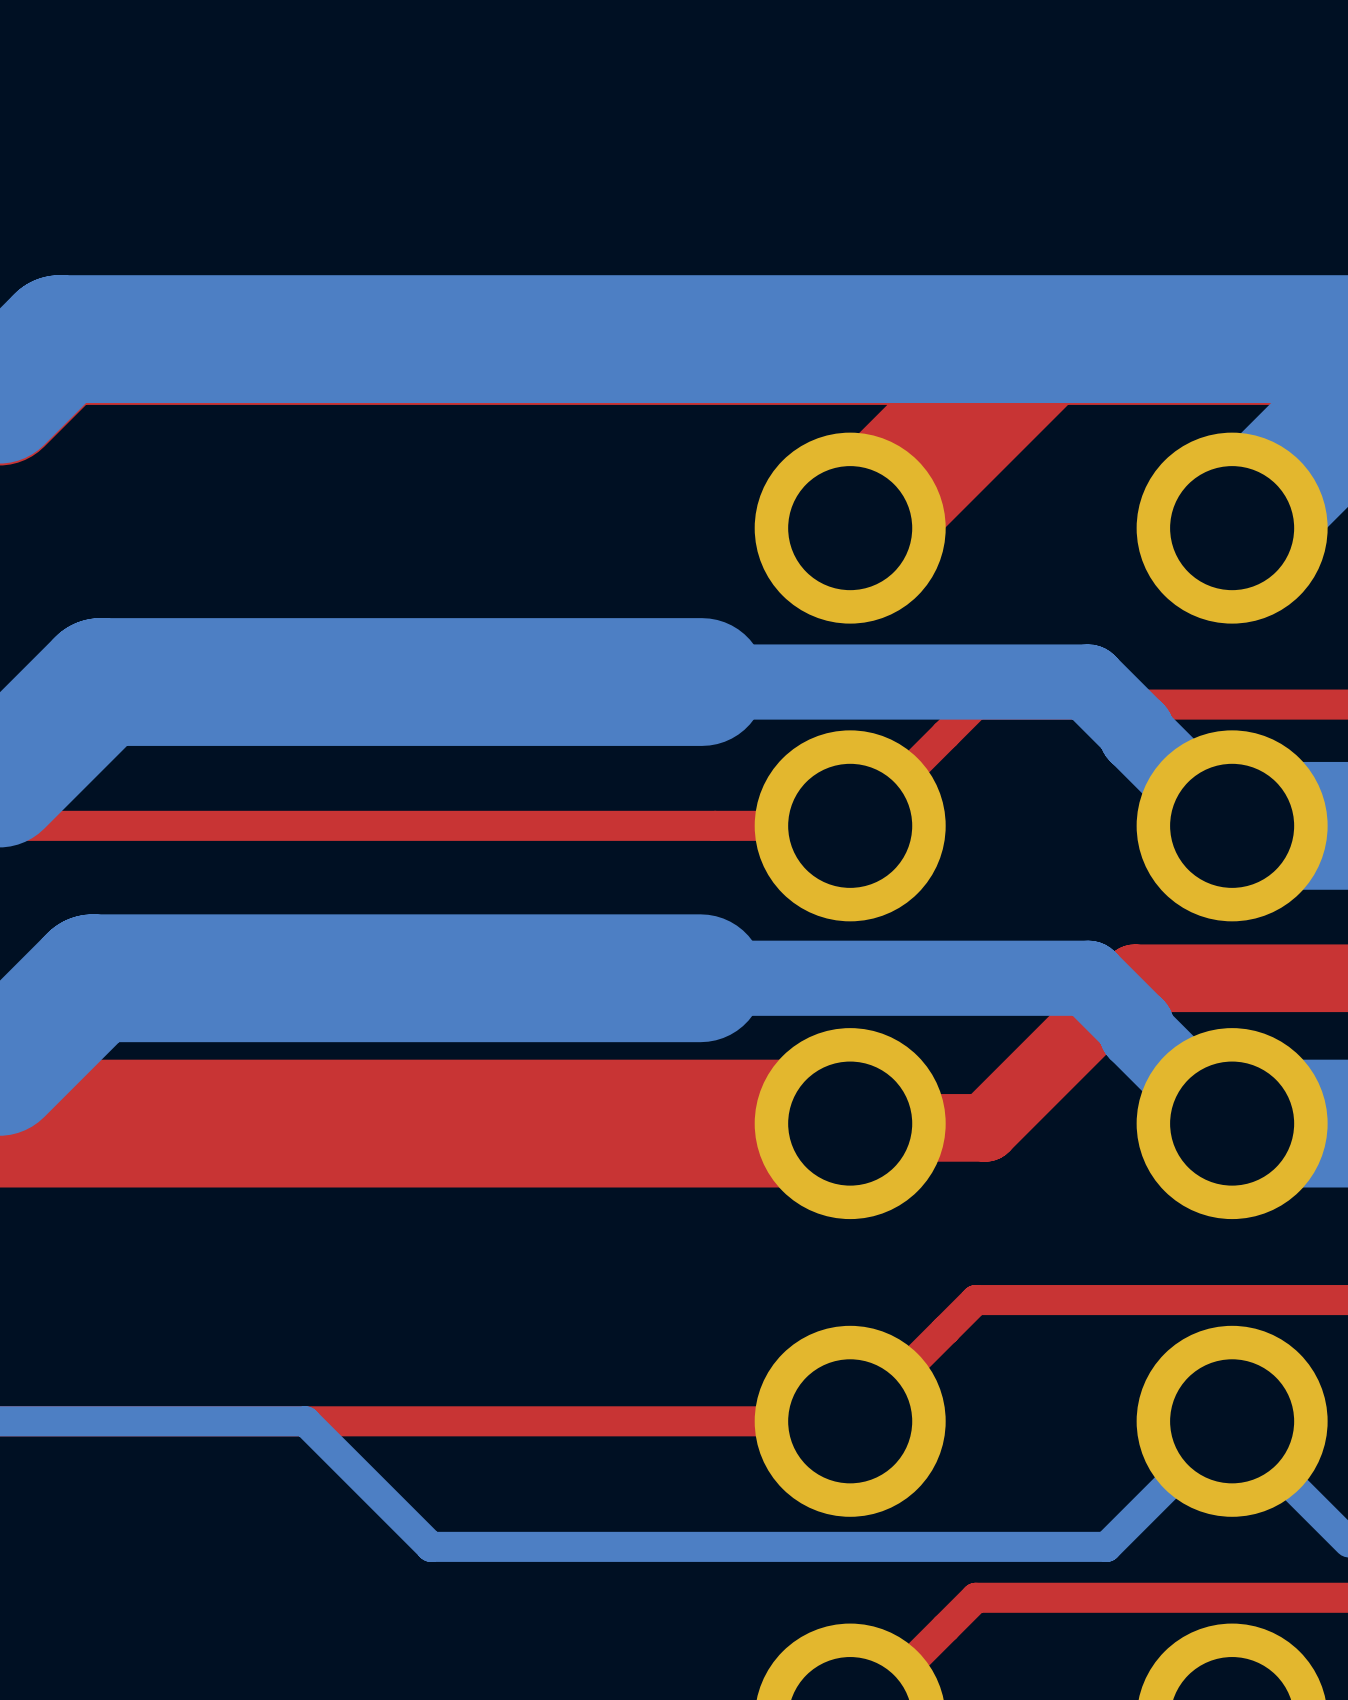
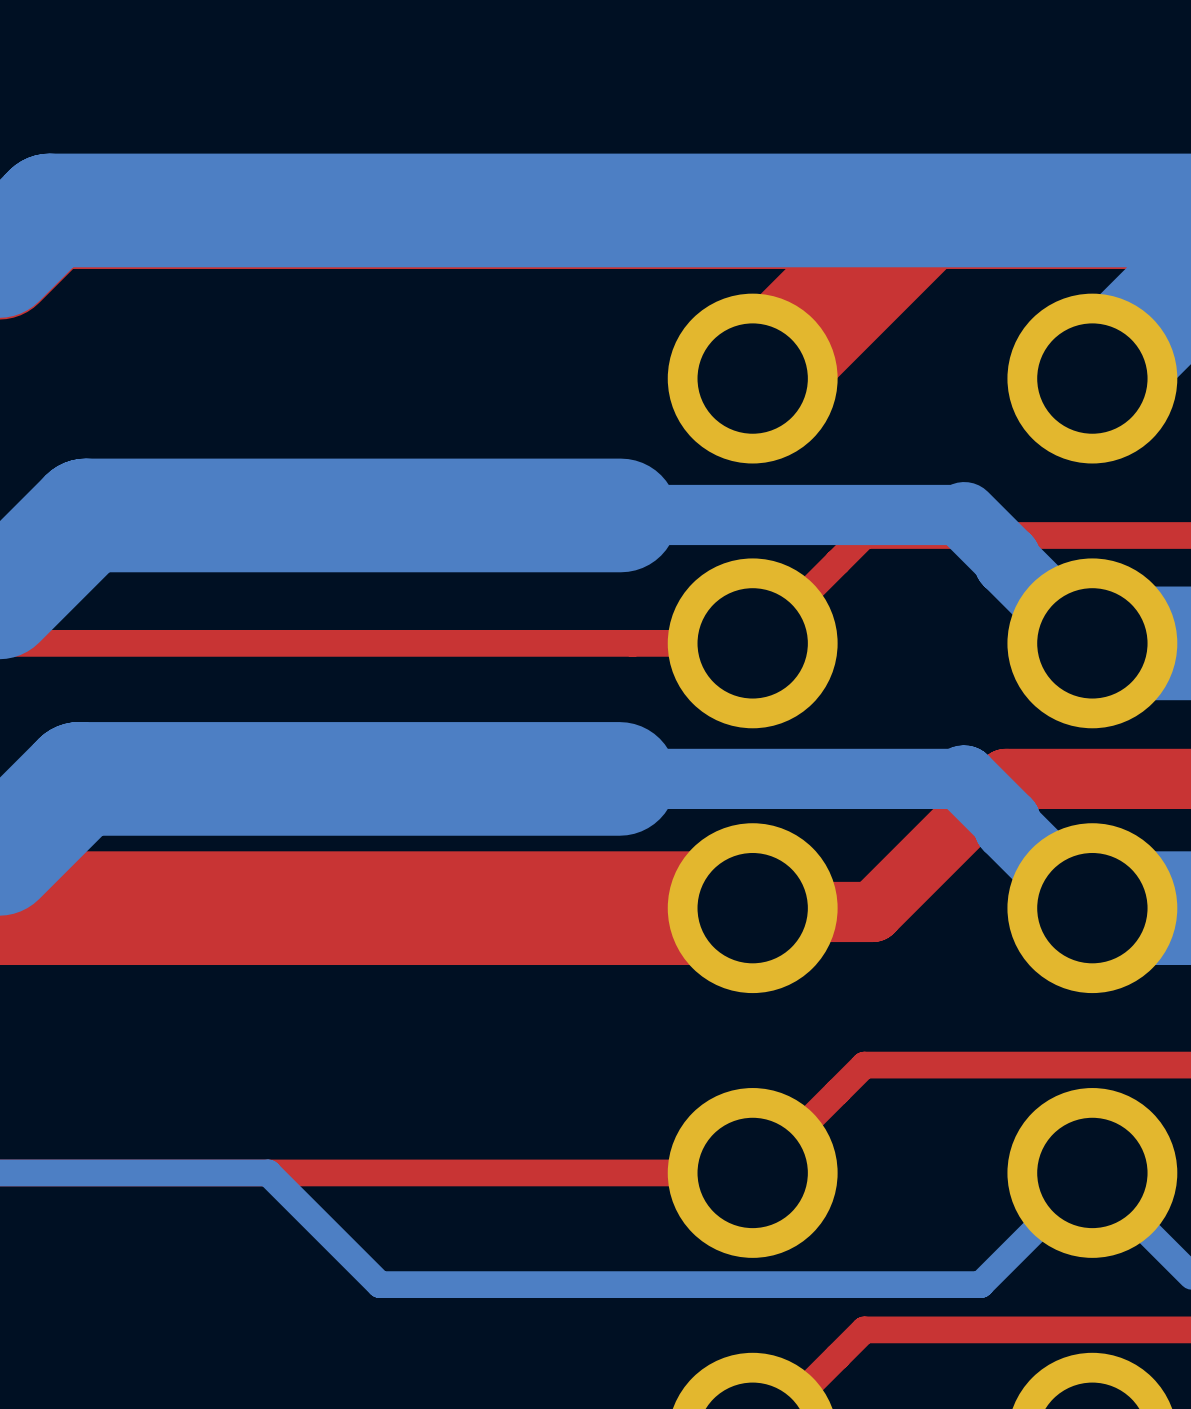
bottom track width: thick (1088, 682) (702, 682) -> thin (964, 515) (620, 515)
bottom track width: thick (1086, 978) (700, 978) -> thin (962, 778) (619, 778)

